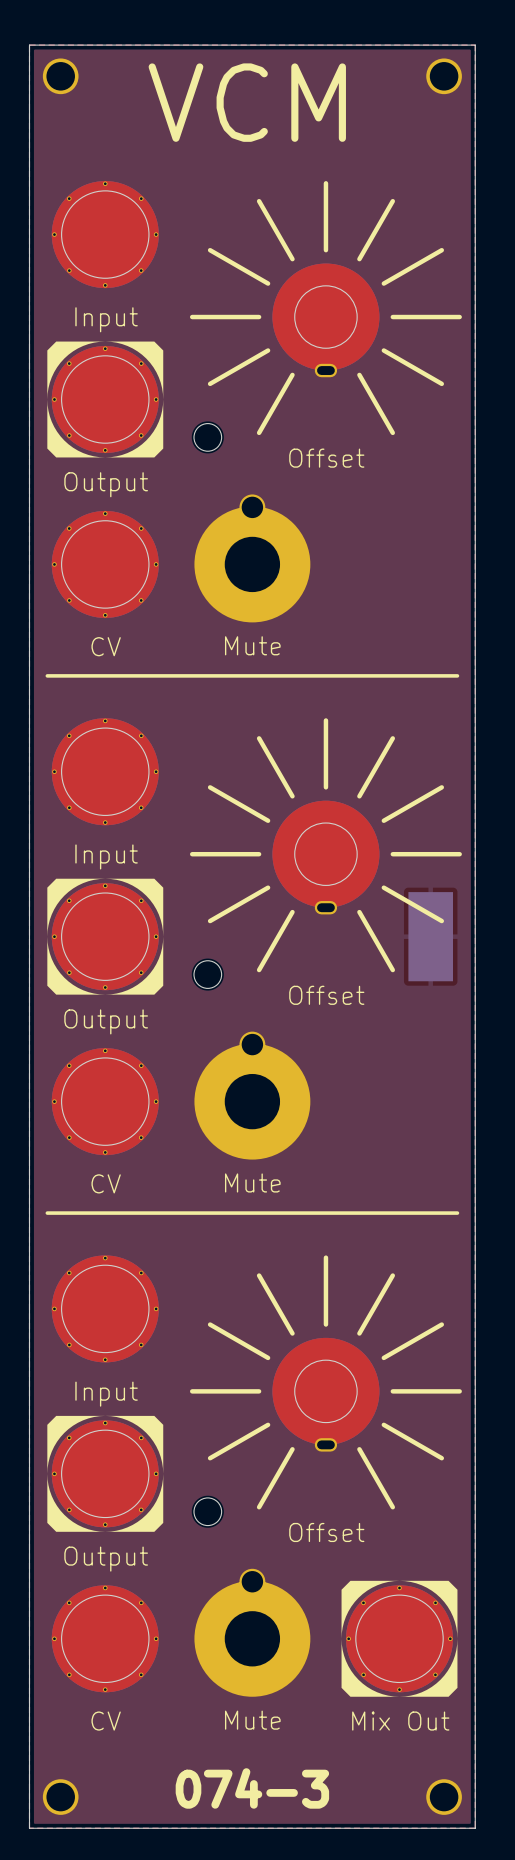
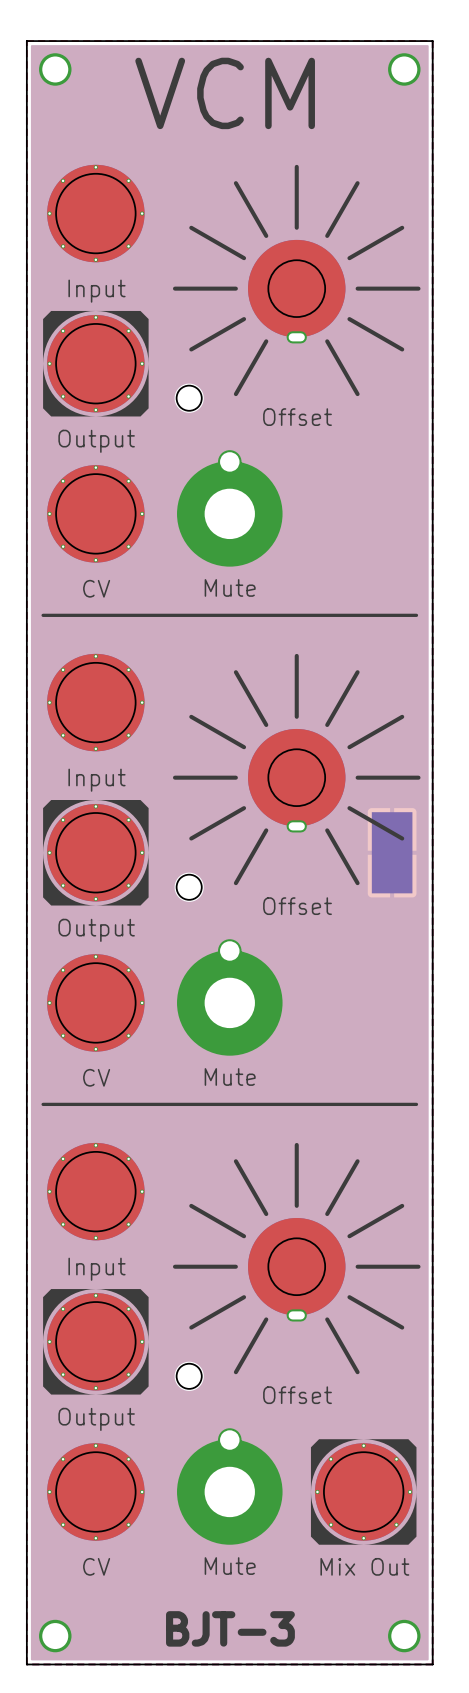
text: 074-3 (252, 1788) -> BJT-3 (230, 1628)

